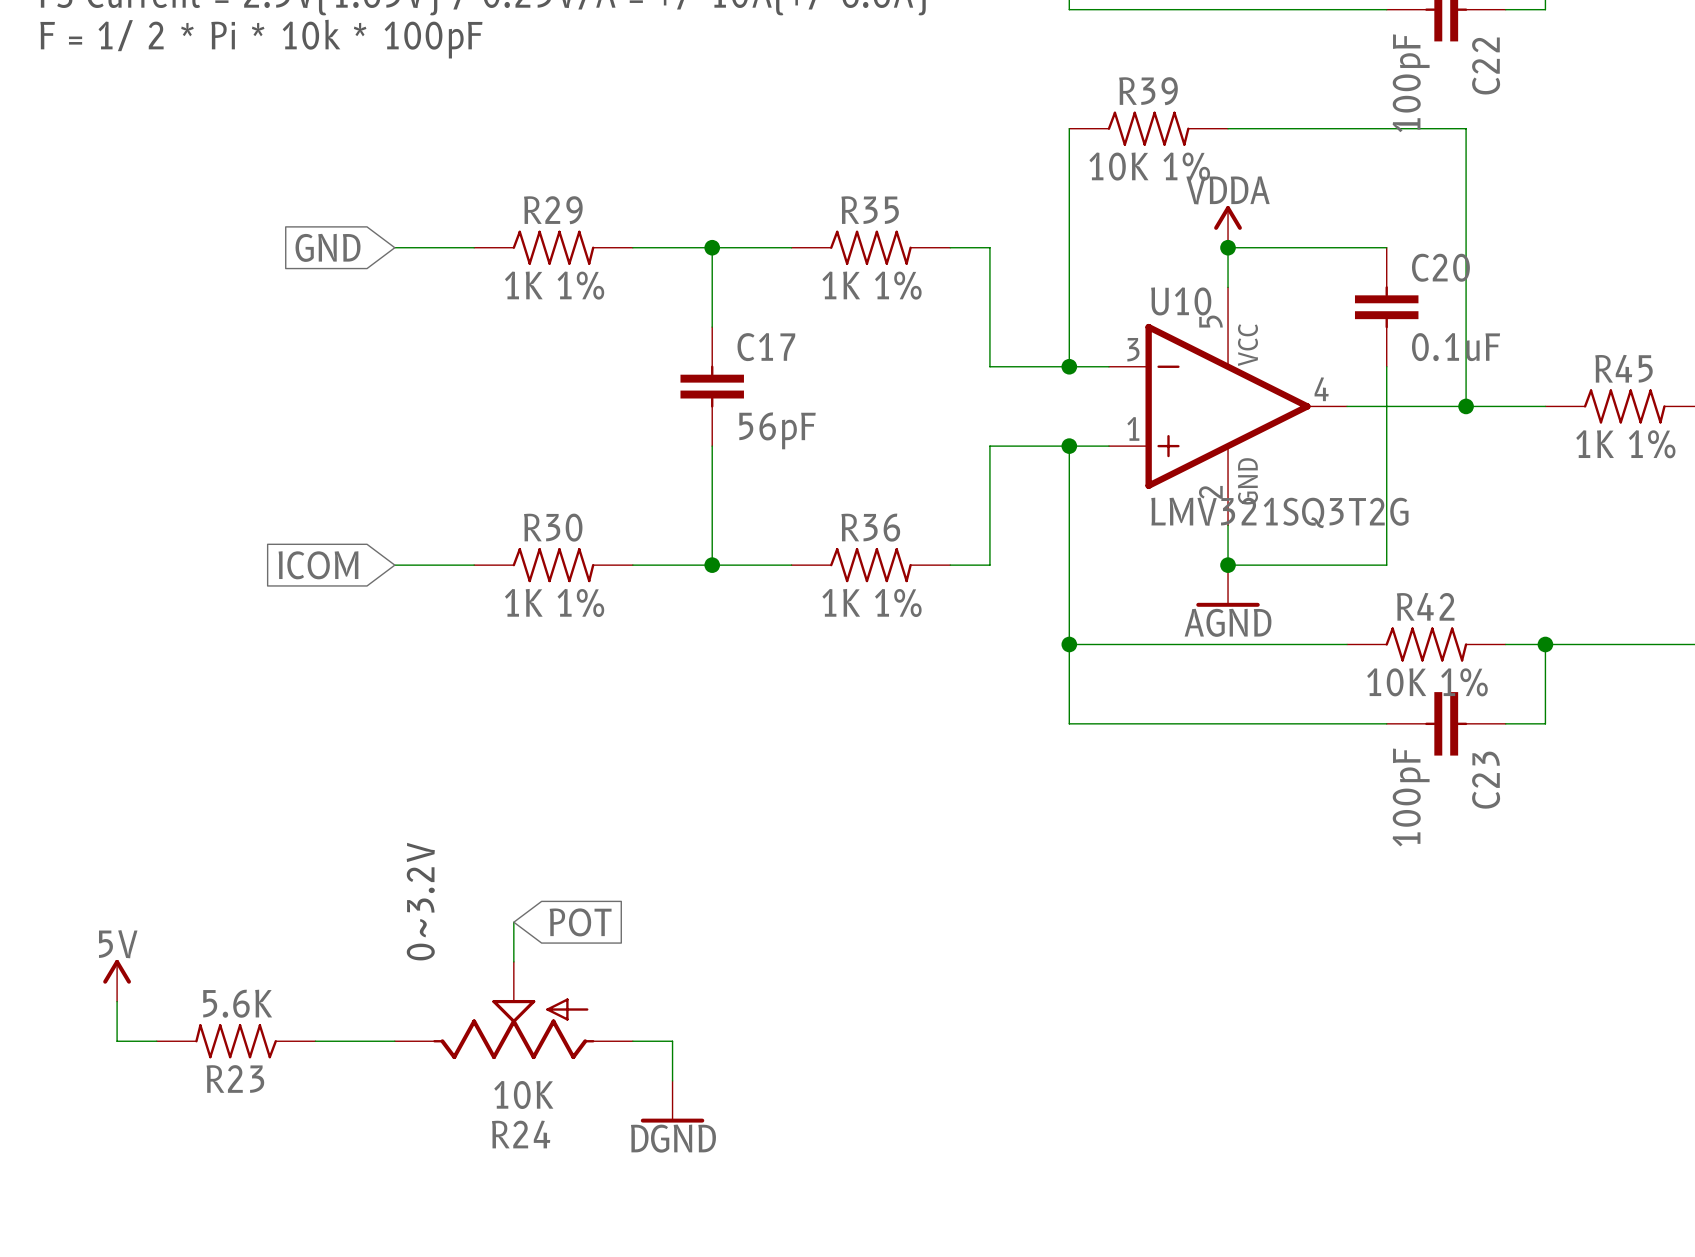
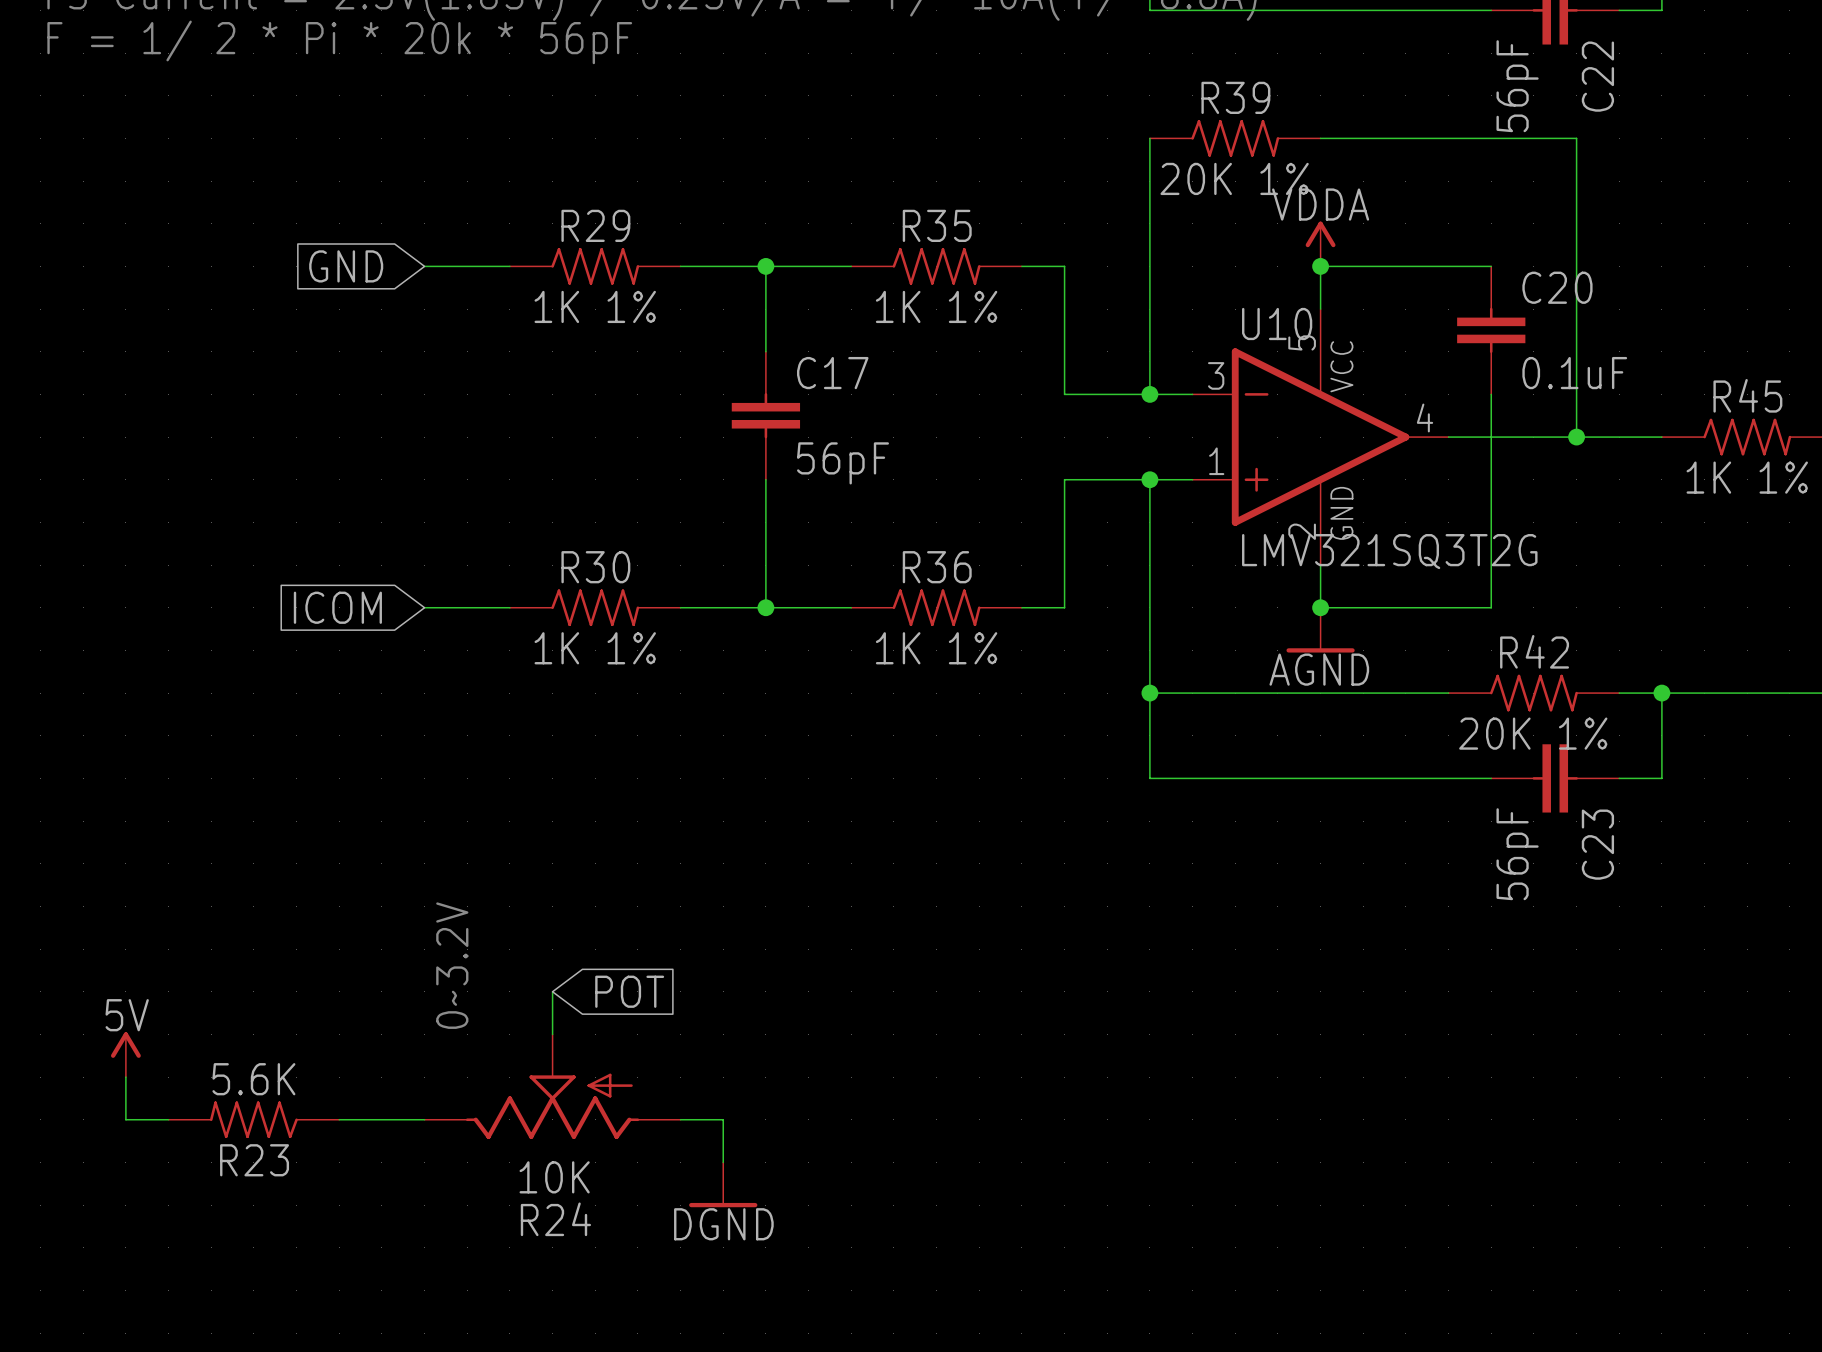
text: F = 1/ 2 * Pi * 10k * 100pF (261, 39) -> F = 1/ 2 * Pi * 20k * 56pF (339, 42)
C22 value: 100pF (1411, 83) -> 56pF (1517, 86)
R39 value: 10K 1% (1149, 166) -> 20K 1% (1234, 178)
R42 value: 10K 1% (1427, 682) -> 20K 1% (1533, 733)
C23 value: 100pF (1411, 797) -> 56pF (1517, 854)

